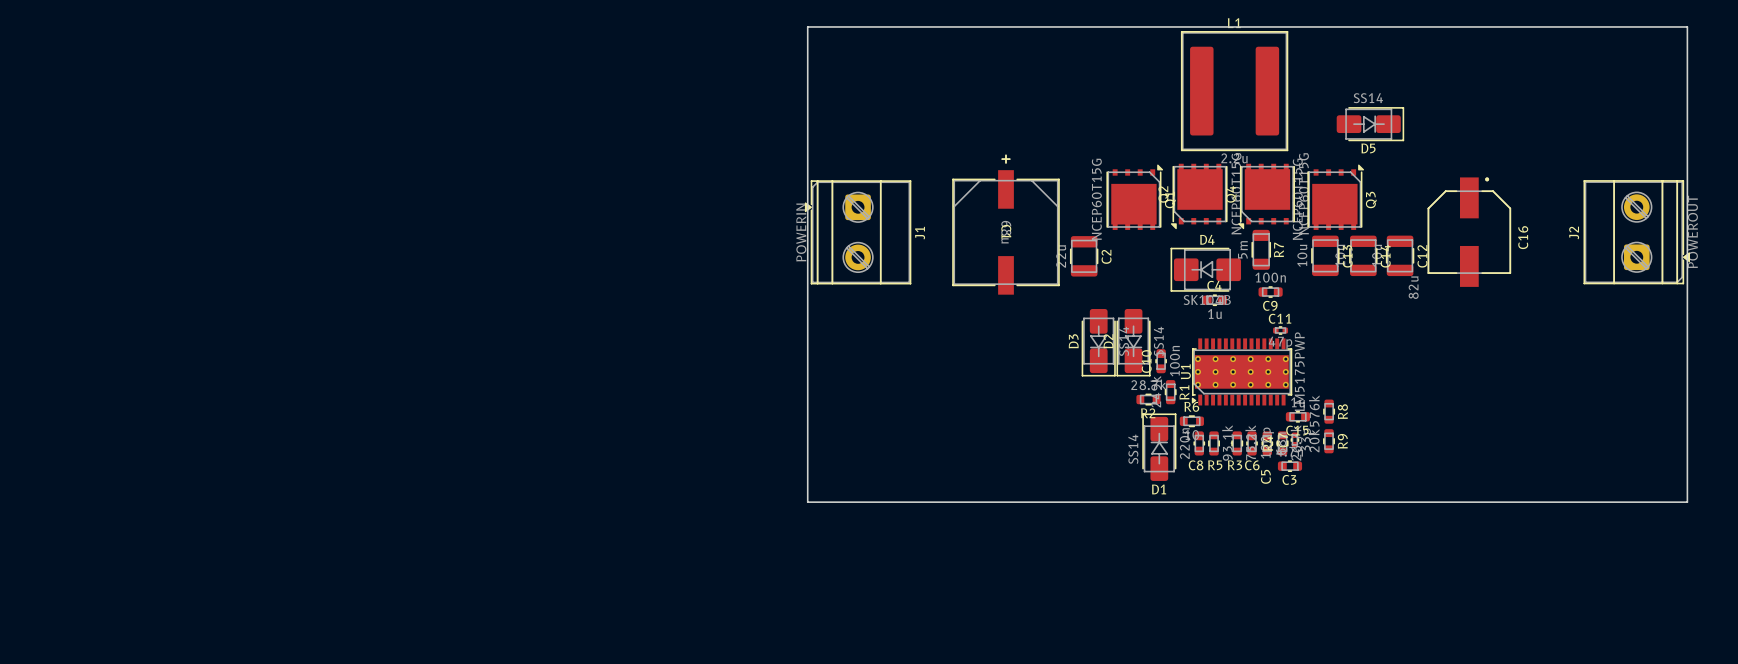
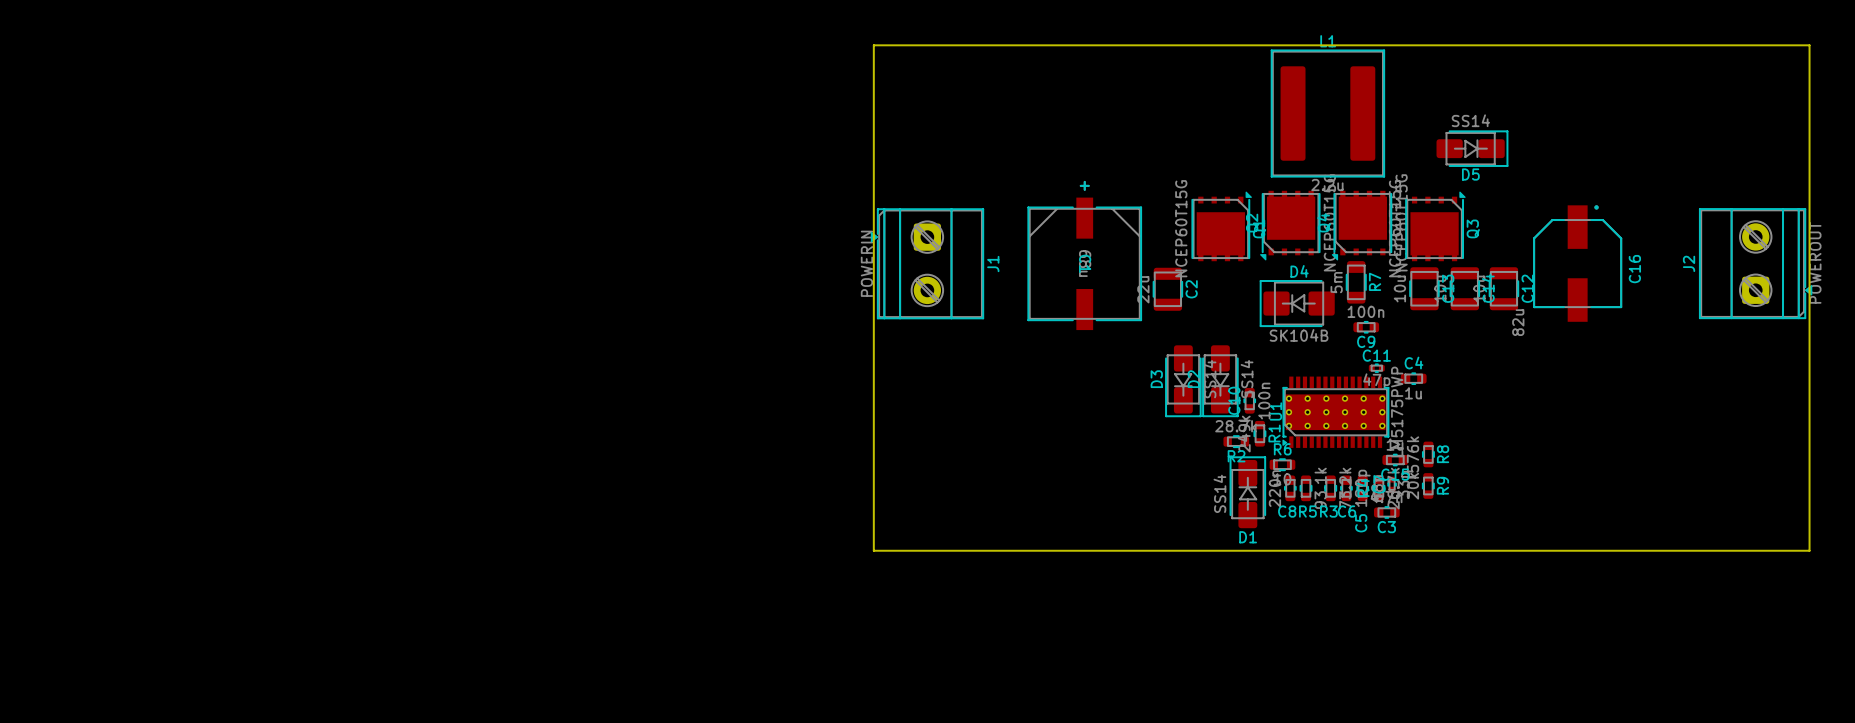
C4 position: (1214, 300) -> (1413, 378)

